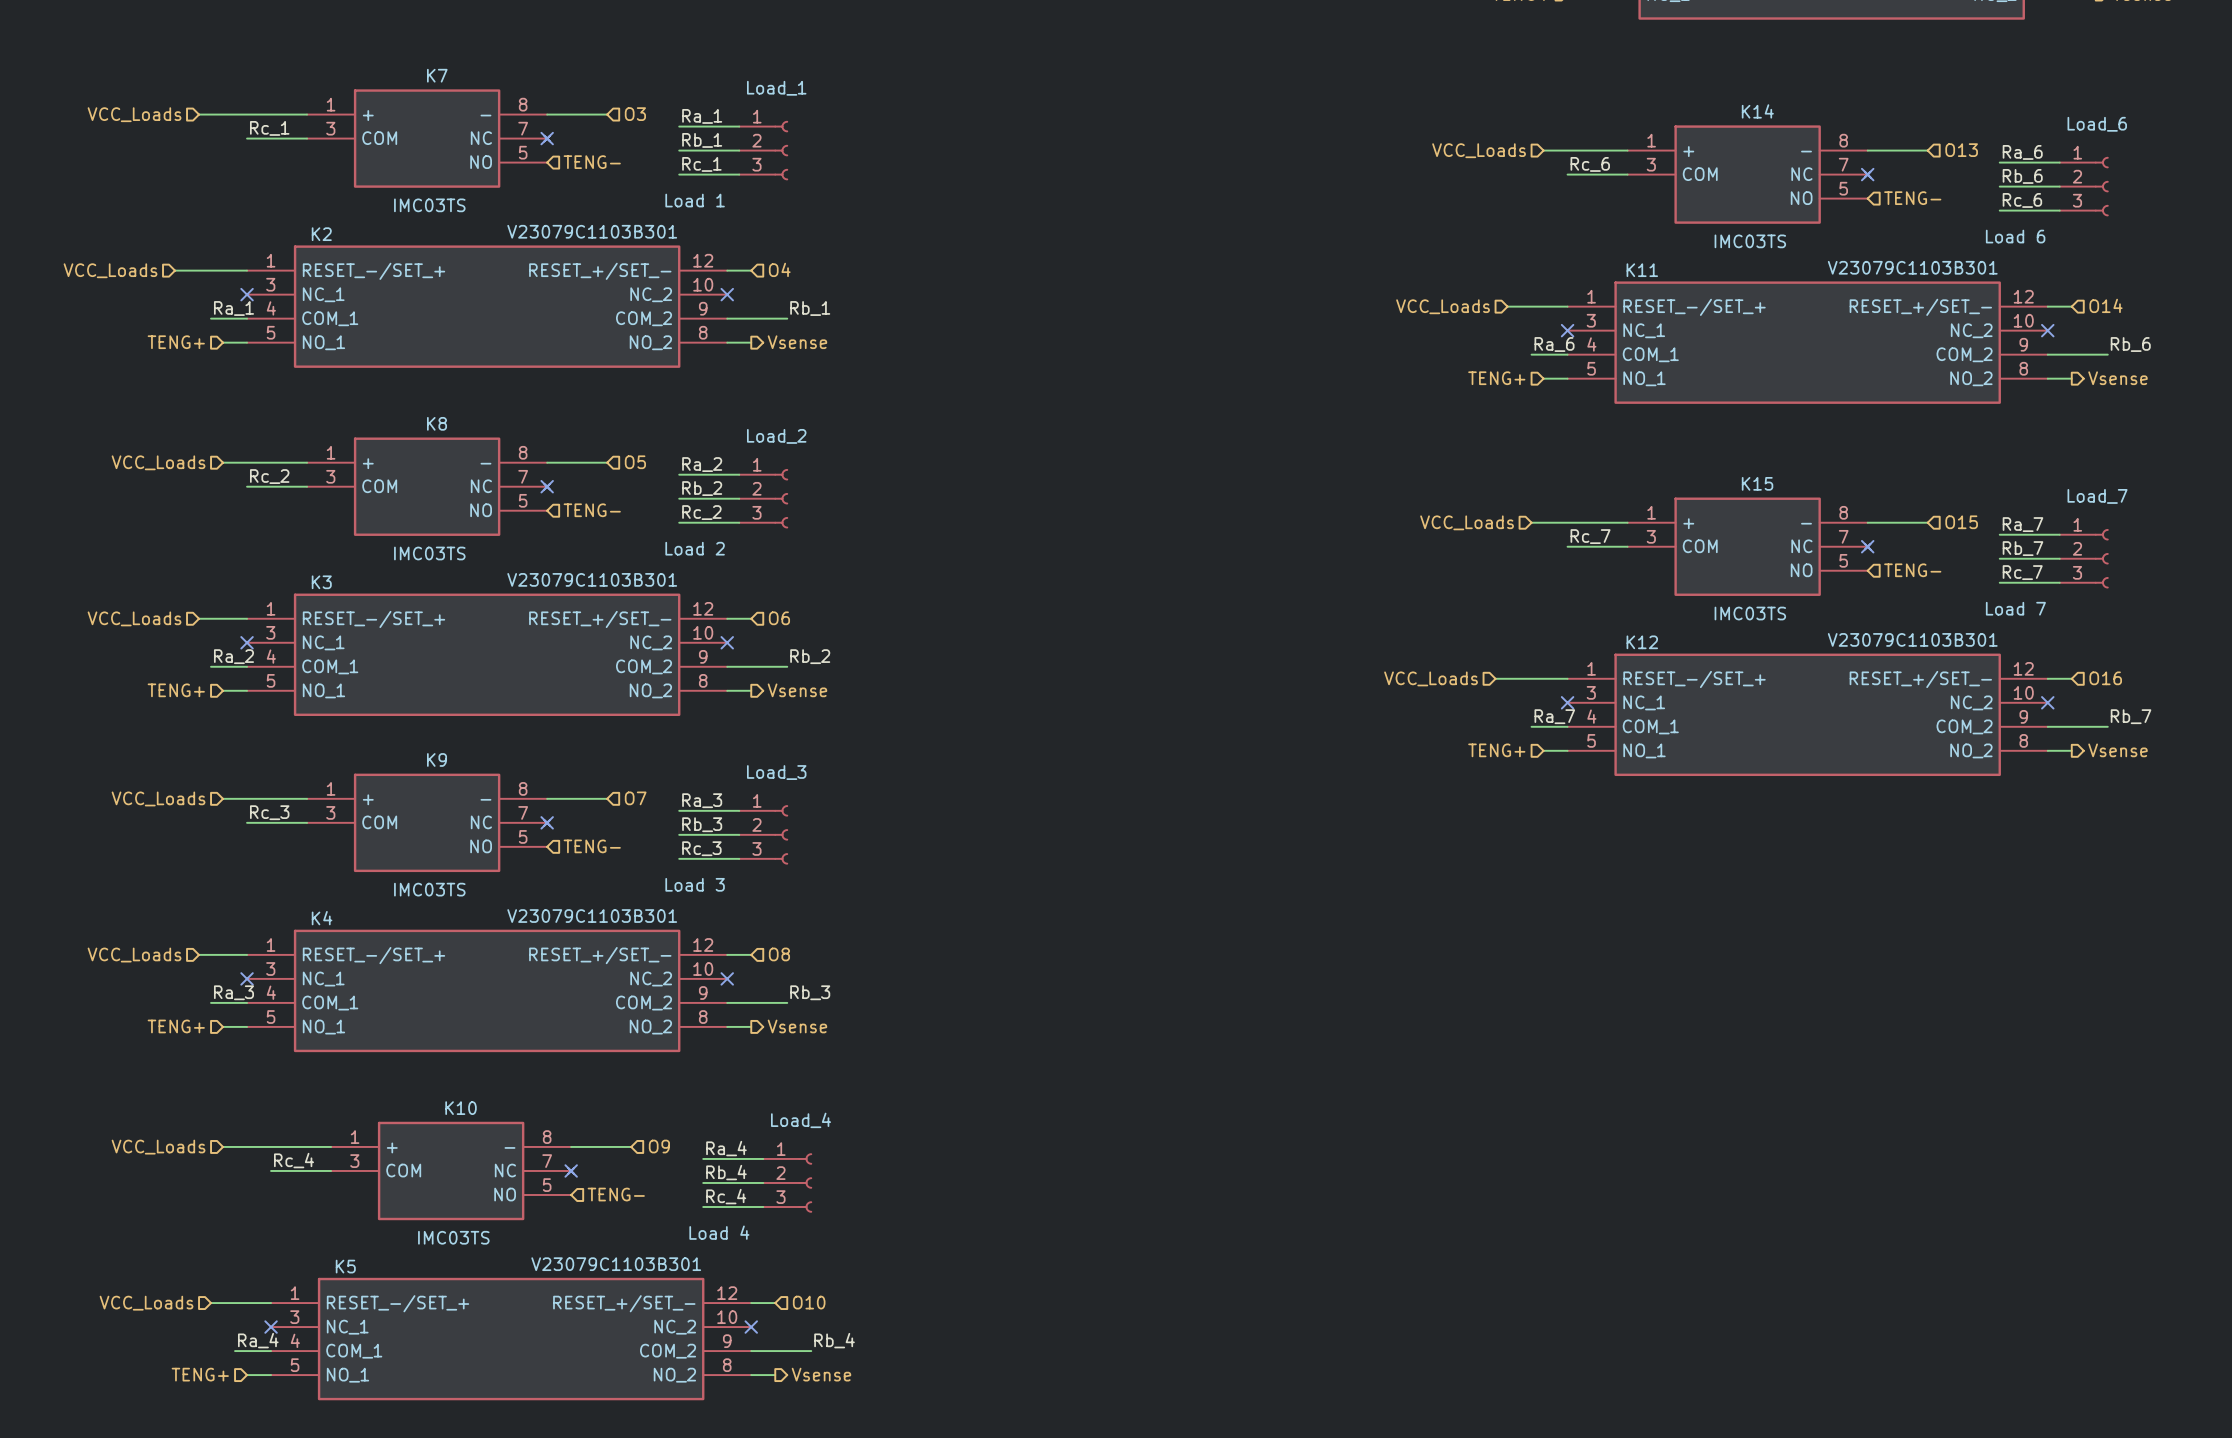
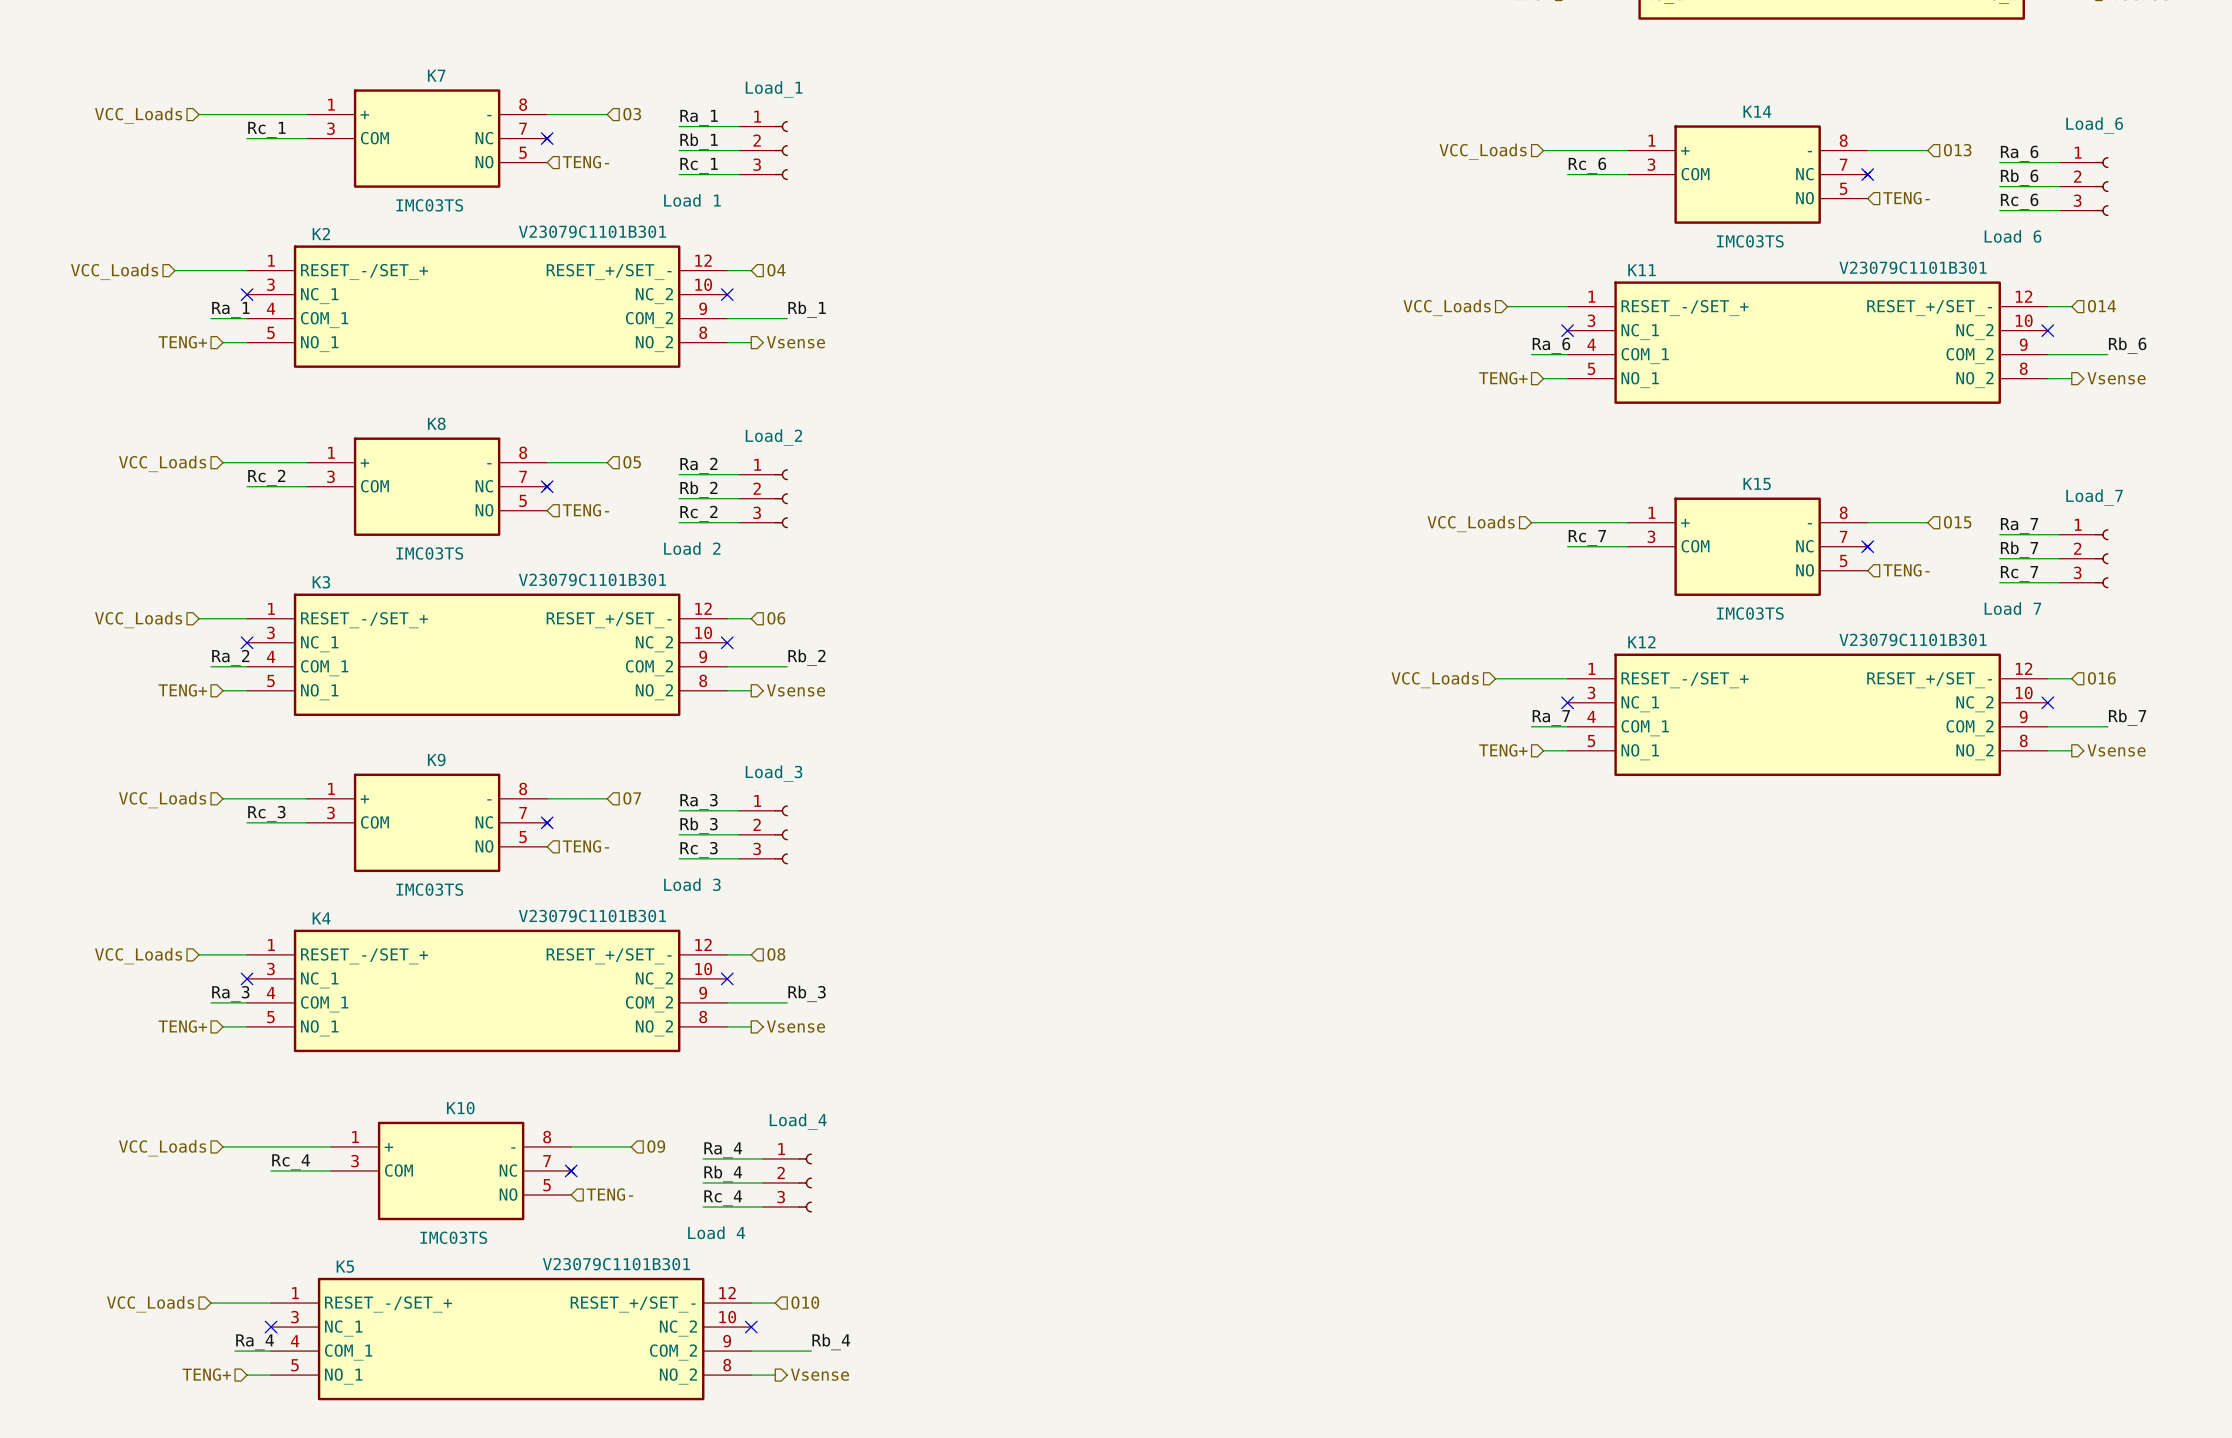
K2 value: V23079C1103B301 (592, 231) -> V23079C1101B301 (592, 231)
K11 value: V23079C1103B301 (1912, 267) -> V23079C1101B301 (1912, 267)
K3 value: V23079C1103B301 (592, 579) -> V23079C1101B301 (592, 579)
K12 value: V23079C1103B301 (1912, 639) -> V23079C1101B301 (1912, 639)
K4 value: V23079C1103B301 (592, 916) -> V23079C1101B301 (592, 916)
K5 value: V23079C1103B301 (616, 1264) -> V23079C1101B301 (616, 1264)

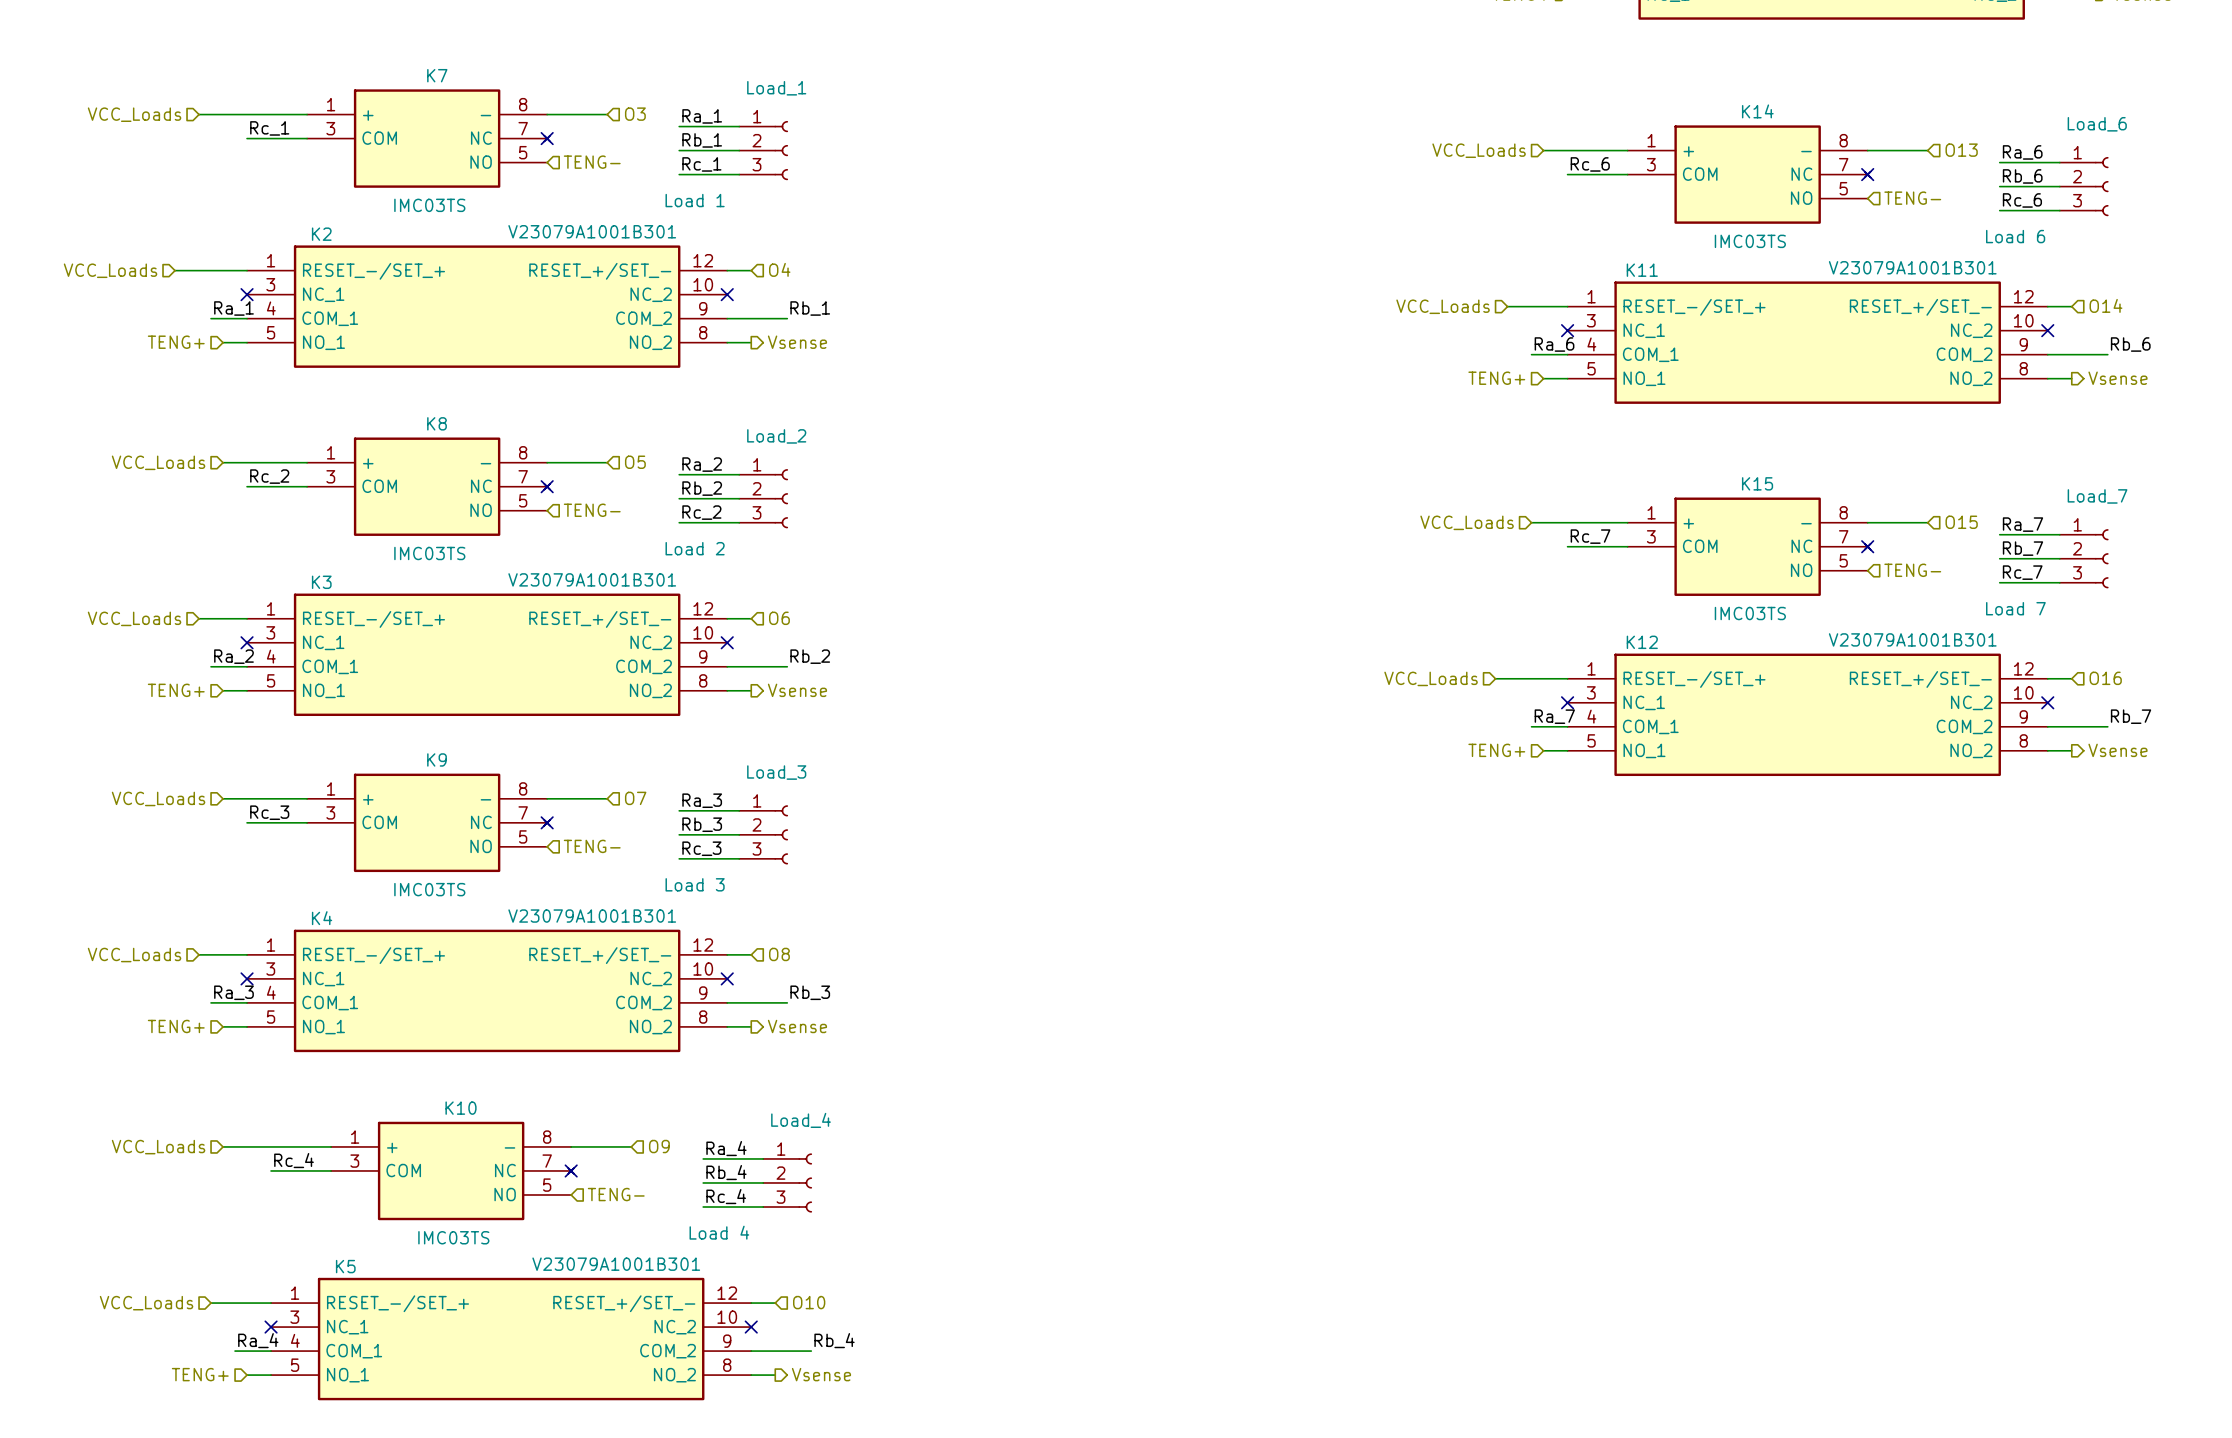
K2 value: V23079C1101B301 (592, 231) -> V23079A1001B301 (592, 231)
K11 value: V23079C1101B301 (1912, 267) -> V23079A1001B301 (1912, 267)
K3 value: V23079C1101B301 (592, 579) -> V23079A1001B301 (592, 579)
K12 value: V23079C1101B301 (1912, 639) -> V23079A1001B301 (1912, 639)
K4 value: V23079C1101B301 (592, 916) -> V23079A1001B301 (592, 916)
K5 value: V23079C1101B301 (616, 1264) -> V23079A1001B301 (616, 1264)

